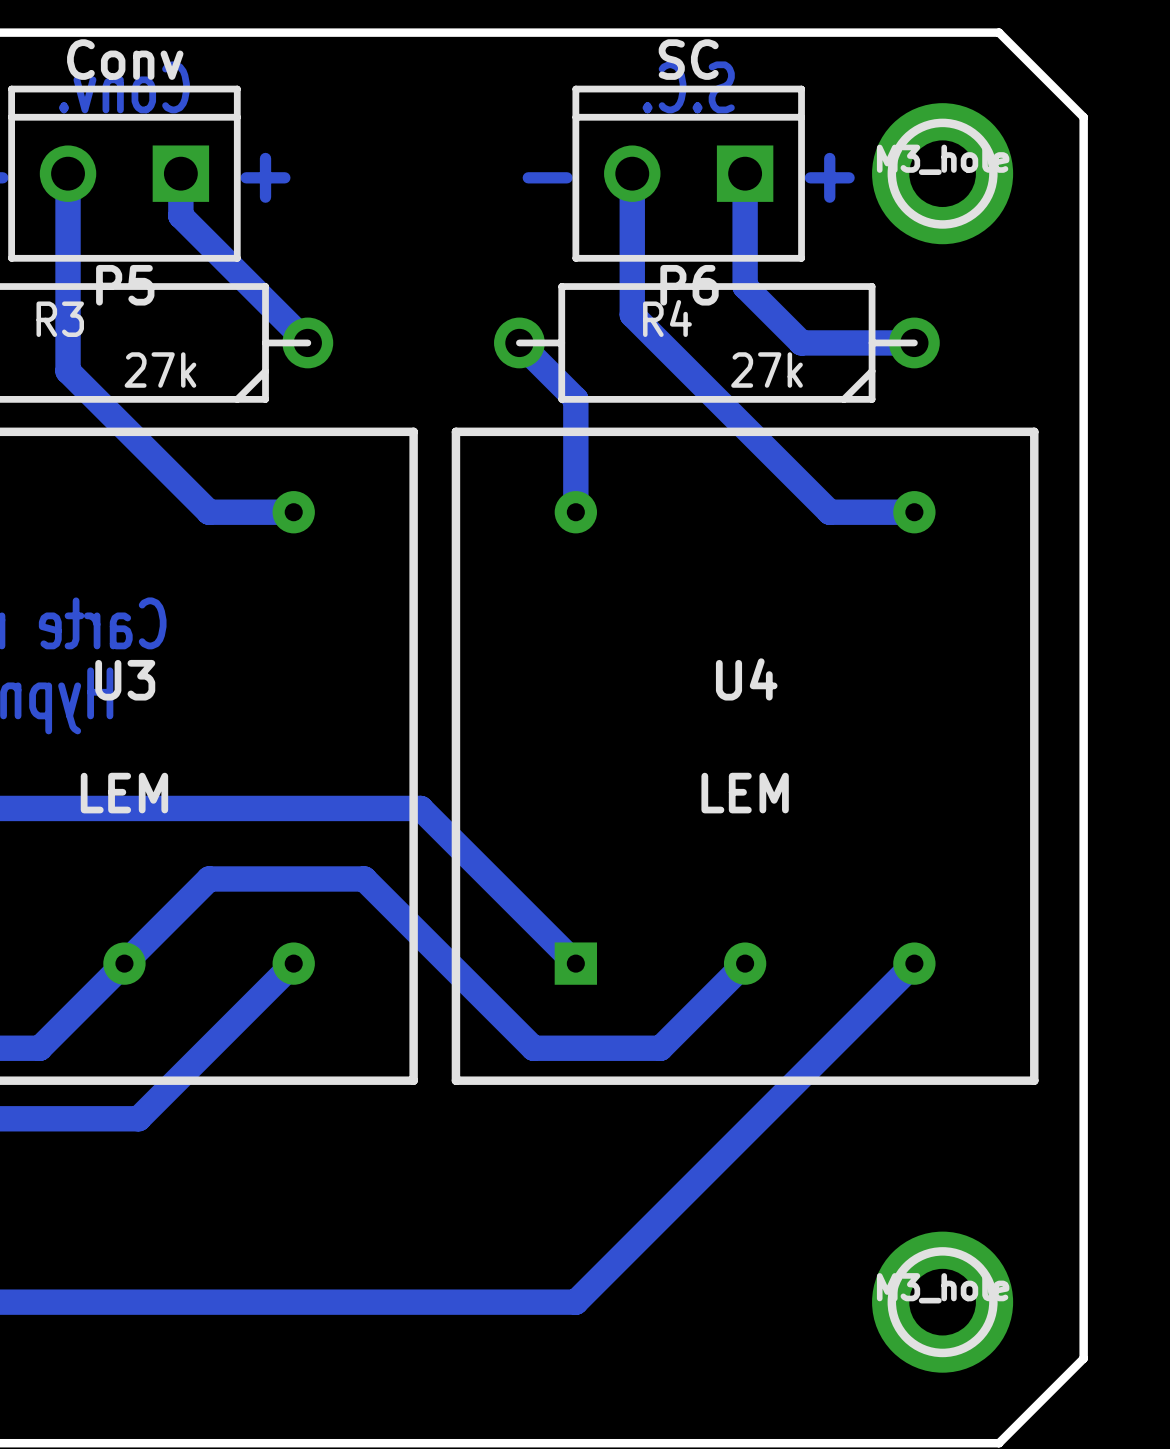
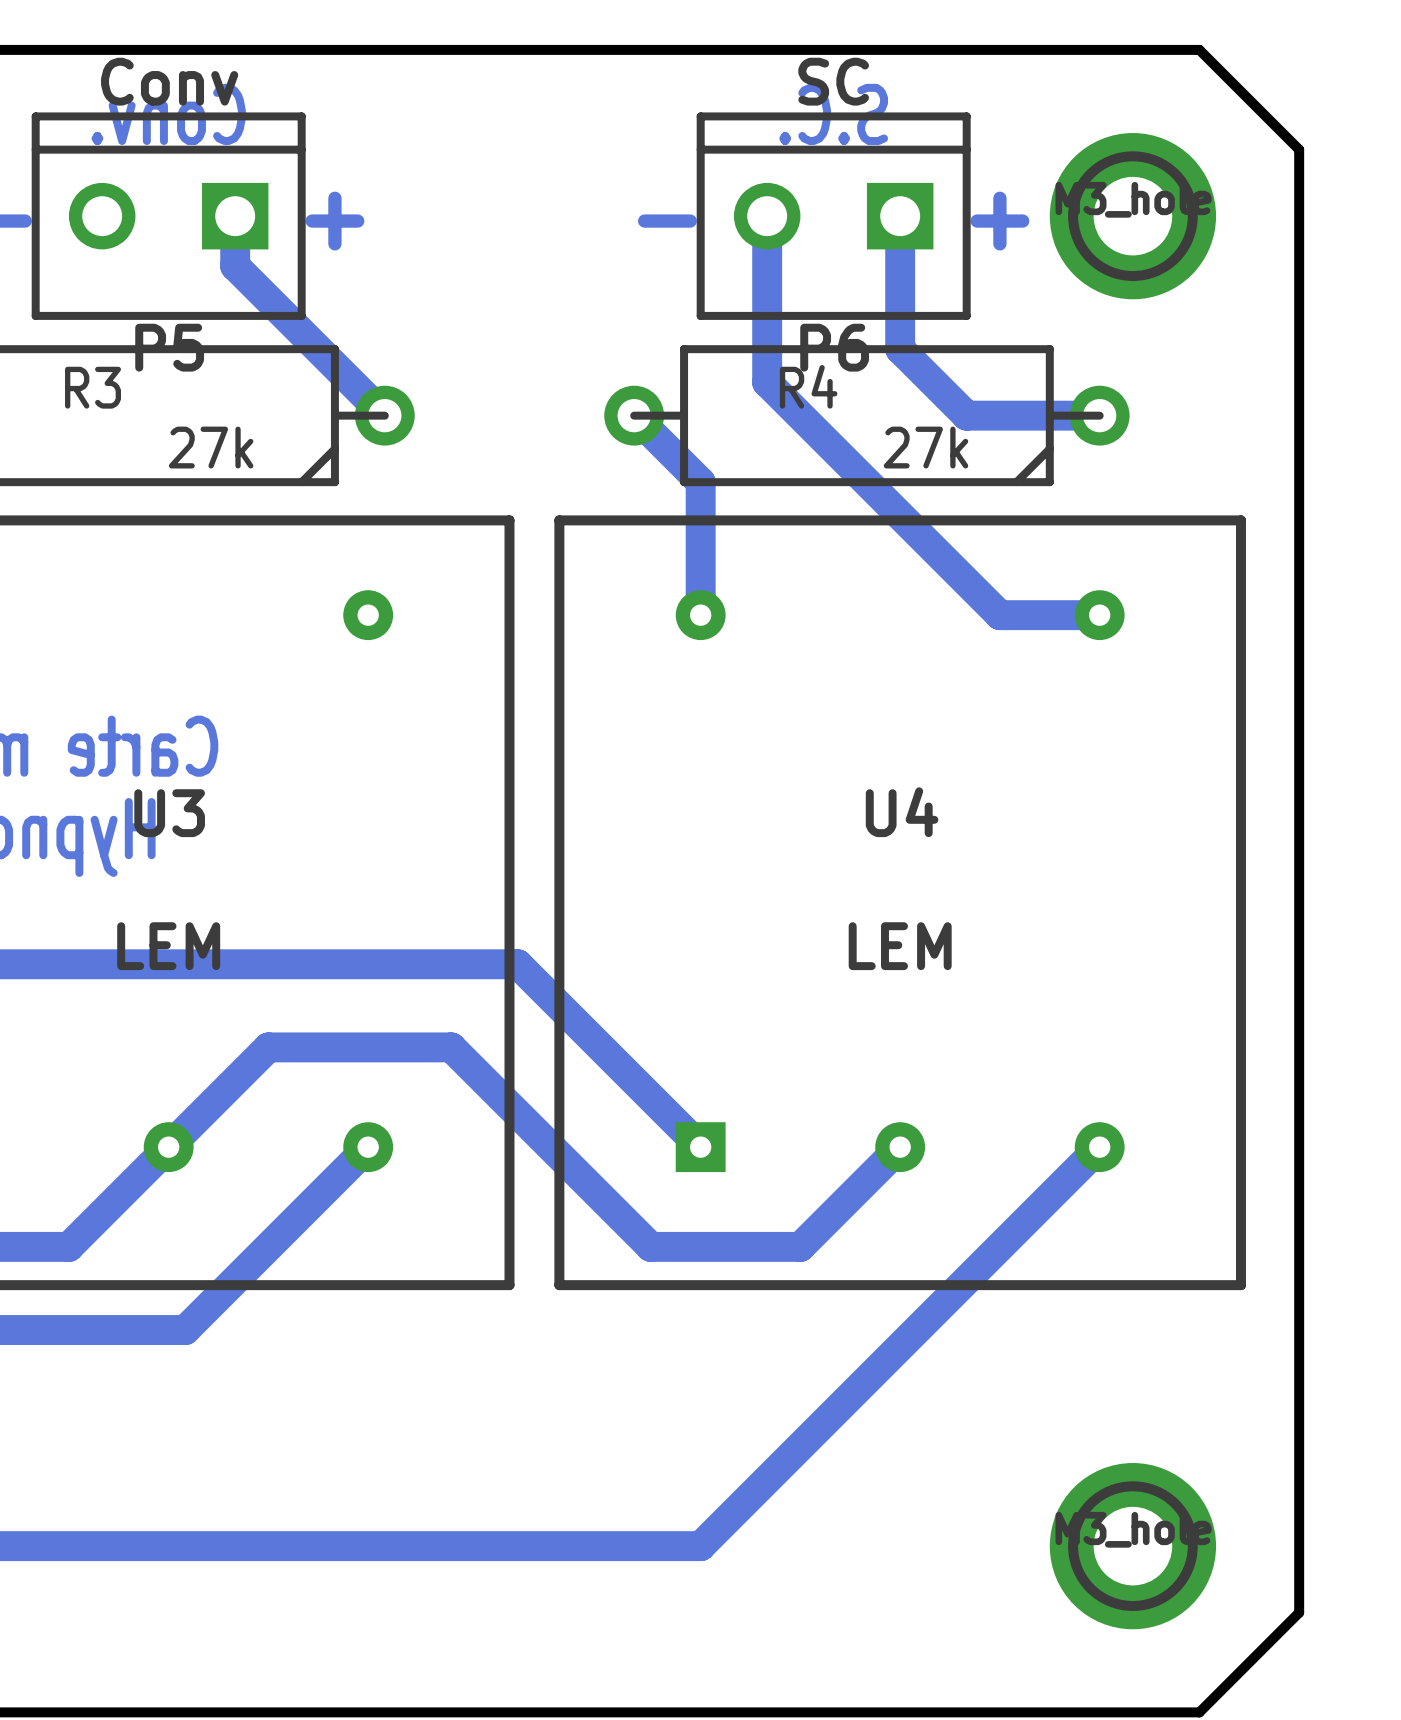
bottom track: (68, 173) (68, 371) (209, 512) (293, 512) -> none

